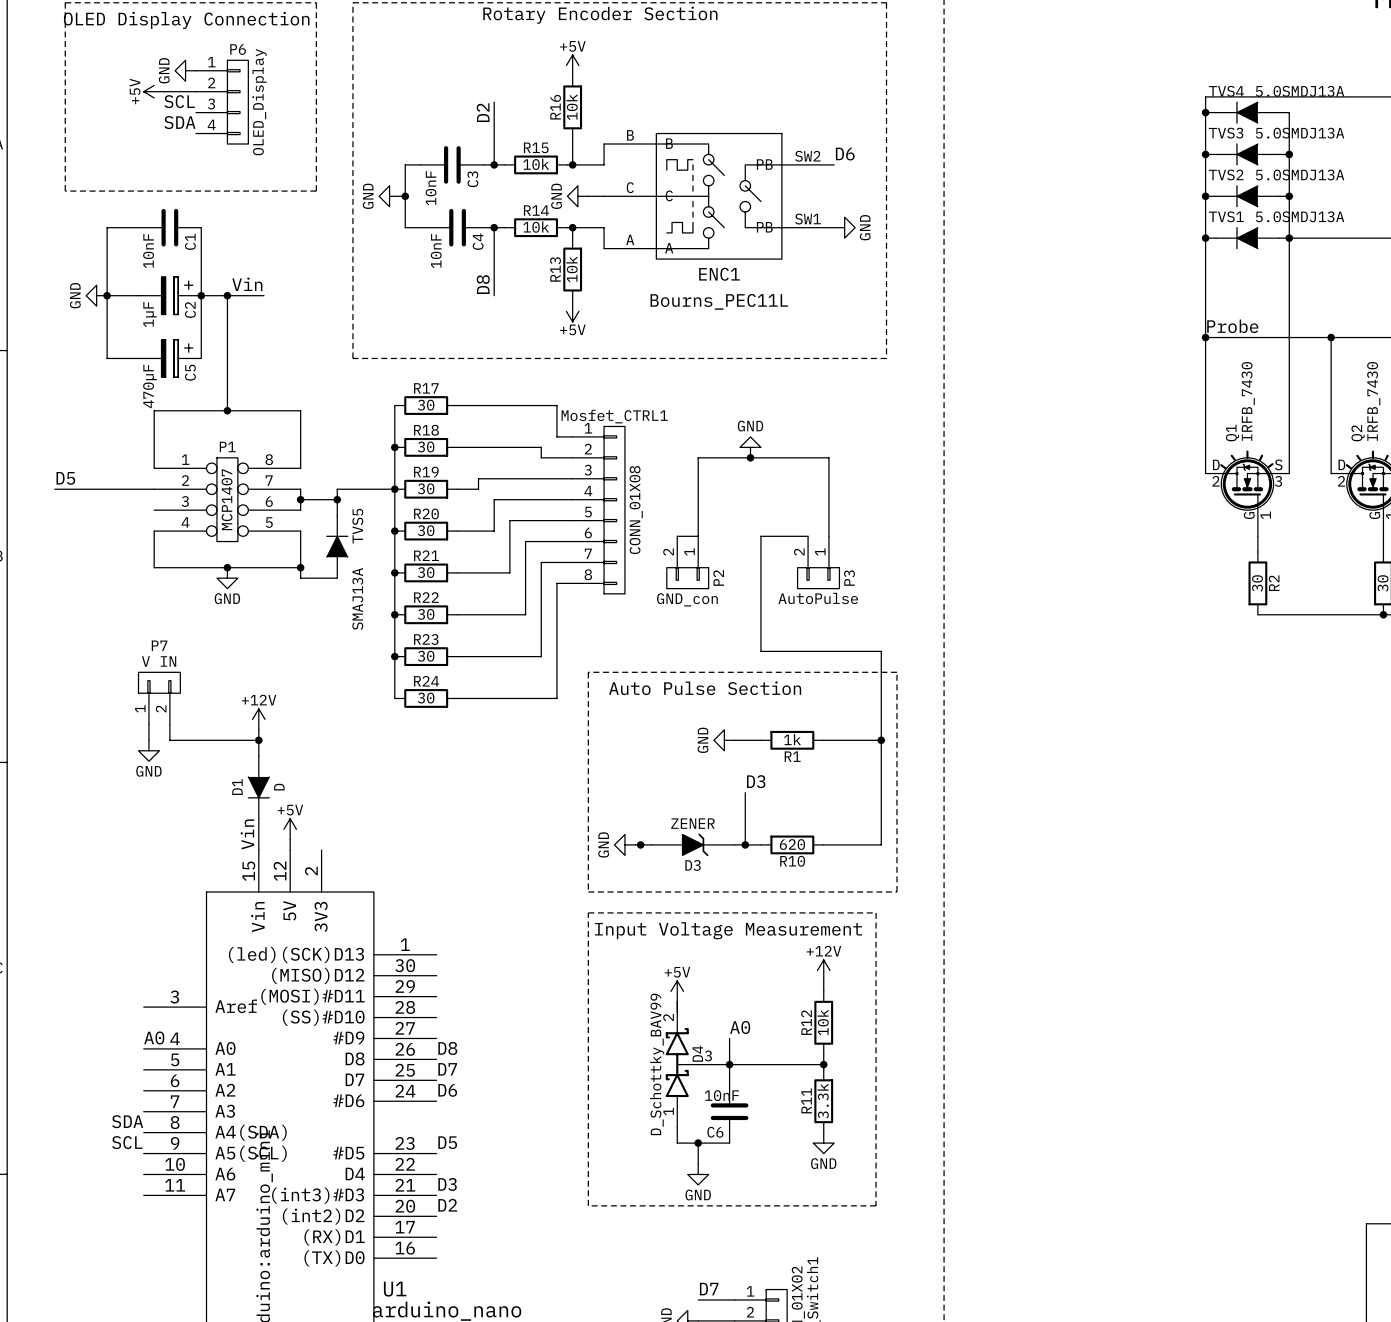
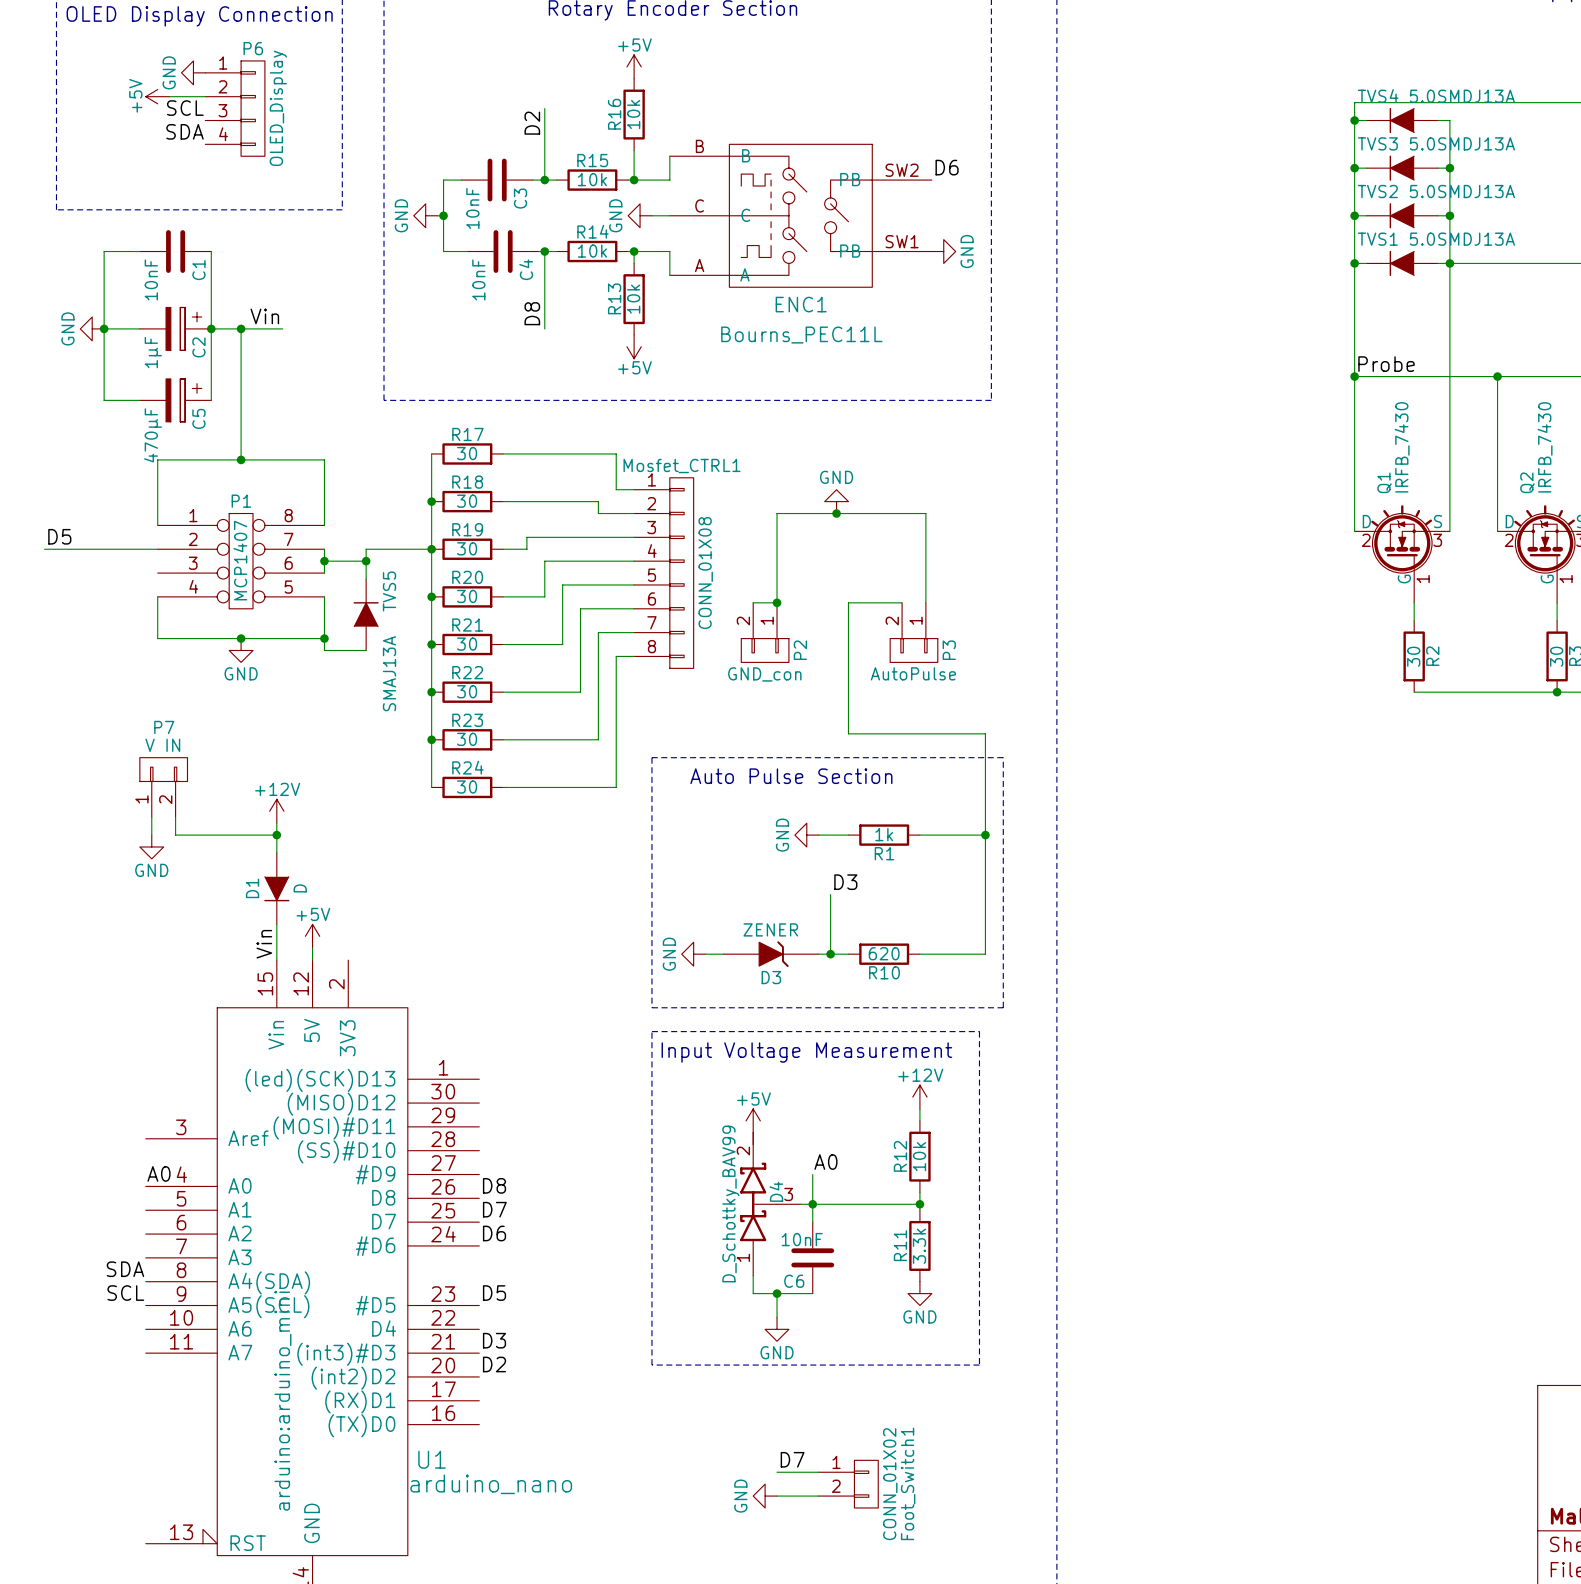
junction: none -> (777, 602)
junction: (640, 844) -> none

